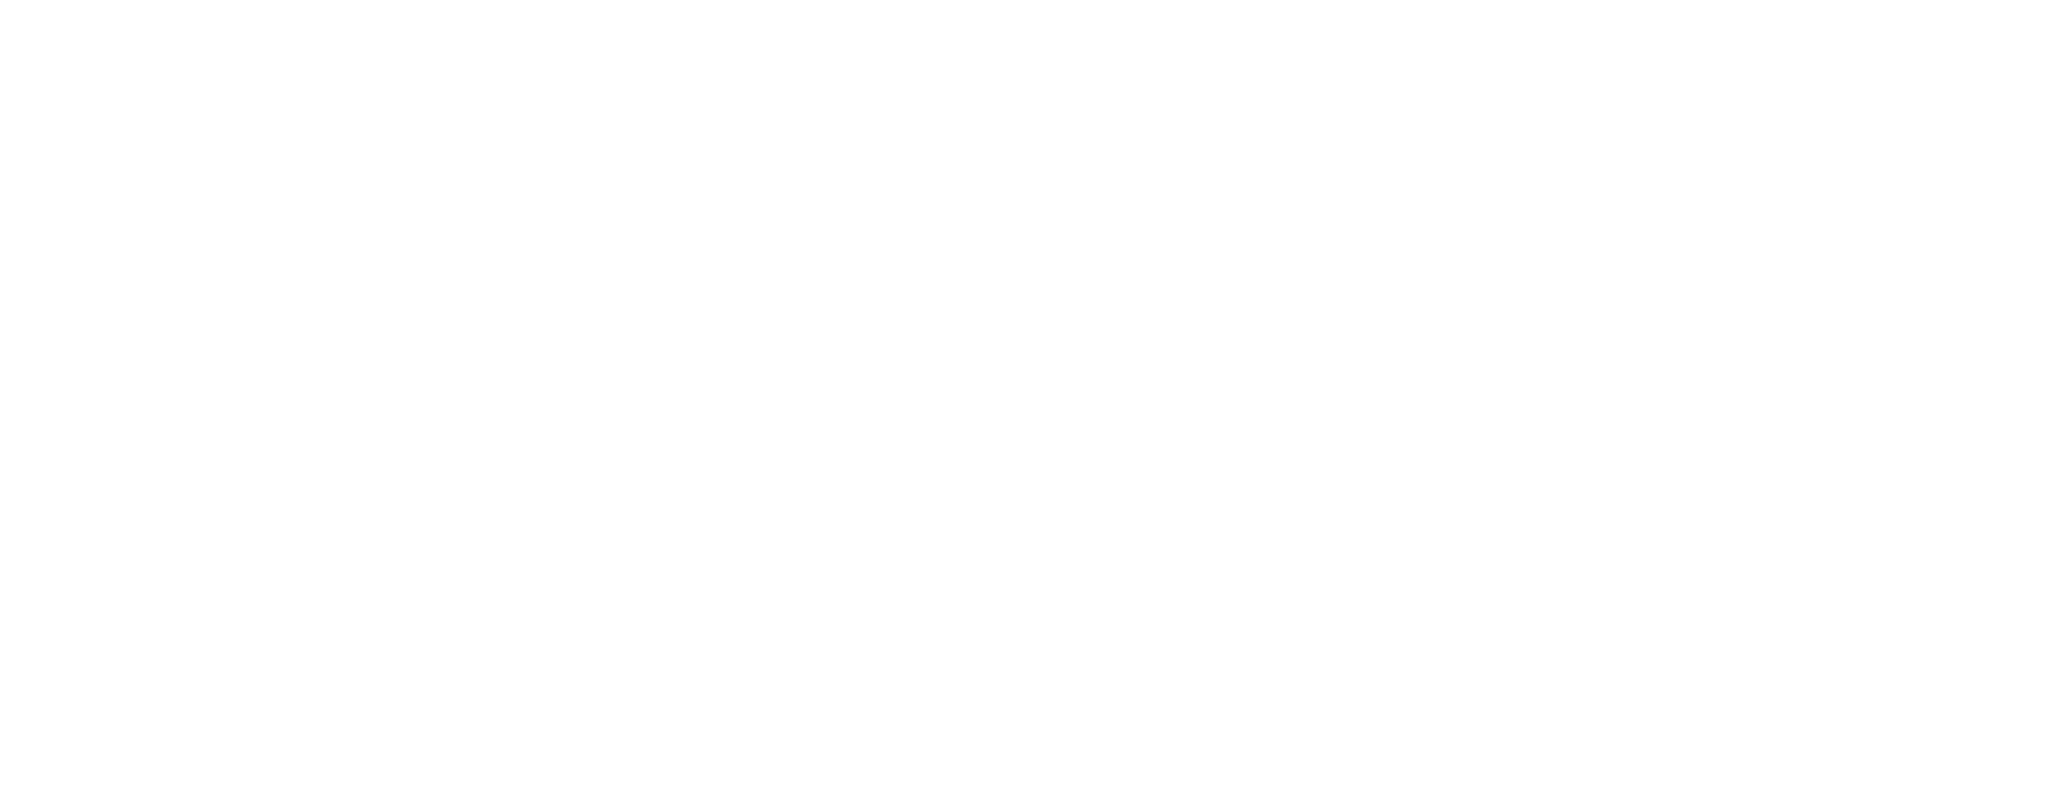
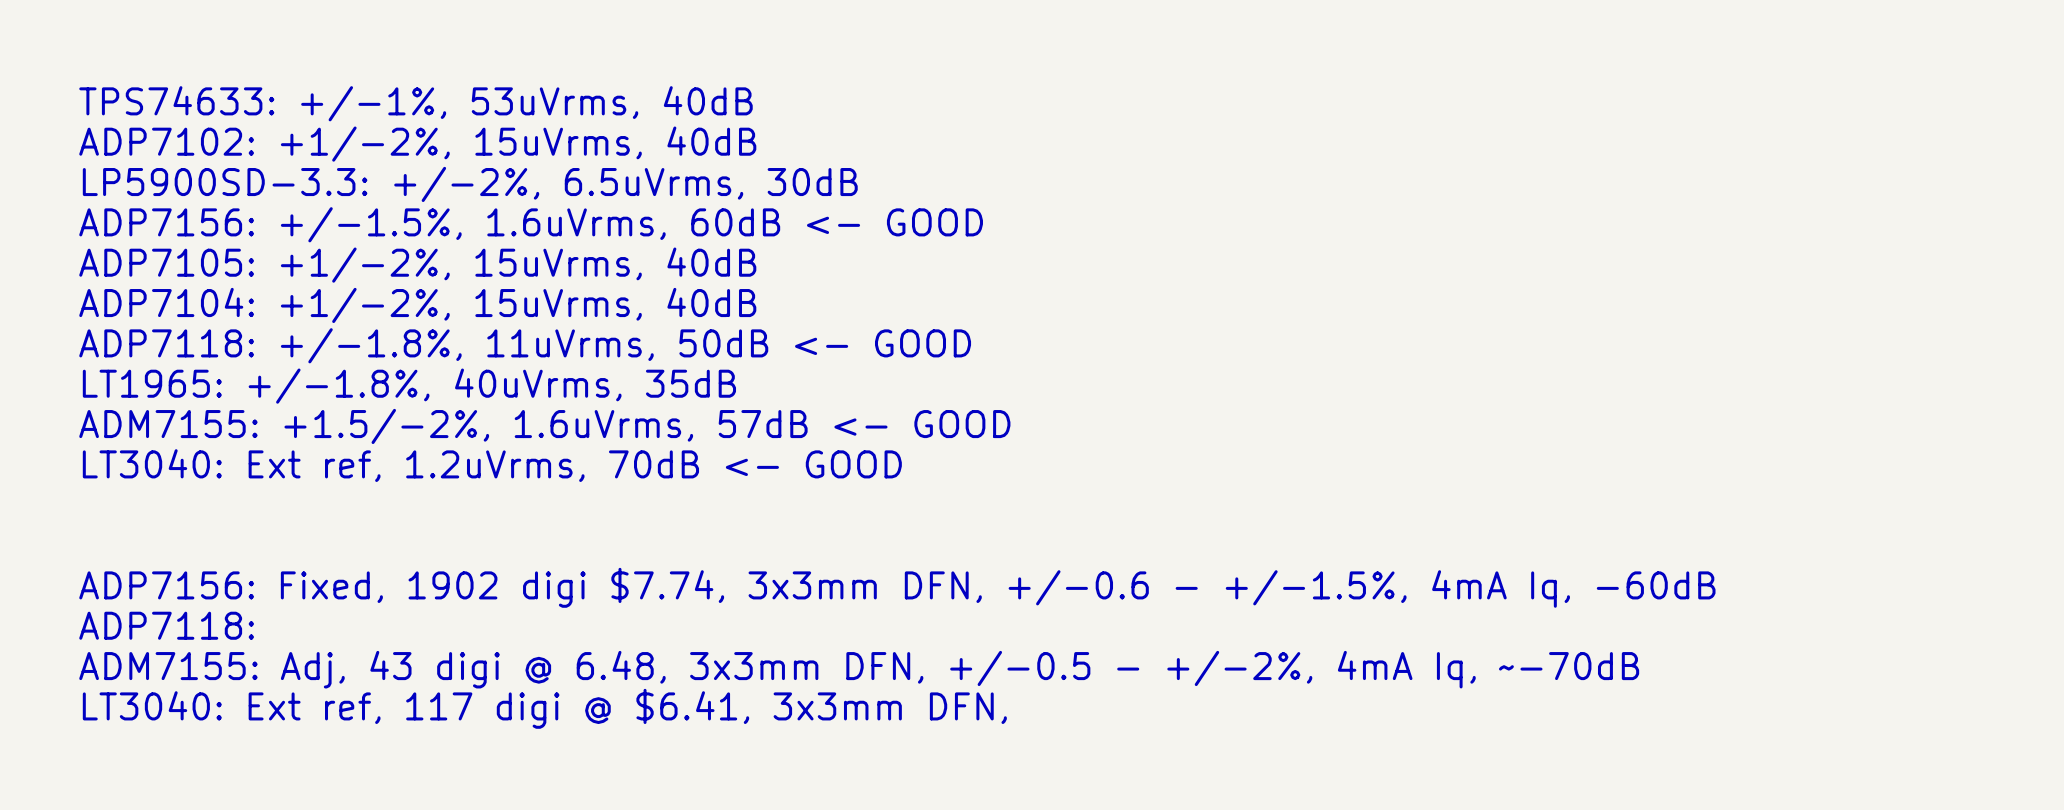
text: none -> TPS74633: +/-1%, 53uVrms, 40dB (415, 103)
text: none -> ADP7102: +1/-2%, 15uVrms, 40dB (417, 144)
text: none -> LP5900SD-3.3: +/-2%, 6.5uVrms, 30dB (470, 184)
text: none -> ADP7156: +/-1.5%, 1.6uVrms, 60dB <- GOOD (531, 224)
text: none -> ADP7105: +1/-2%, 15uVrms, 40dB (417, 265)
text: none -> ADP7104: +1/-2%, 15uVrms, 40dB (417, 305)
text: none -> ADP7118: +/-1.8%, 11uVrms, 50dB <- GOOD (525, 345)
text: none -> LT1965: +/-1.8%, 40uVrms, 35dB (409, 386)
text: none -> ADM7155: +1.5/-2%, 1.6uVrms, 57dB <- GOOD (544, 426)
text: none -> LT3040: Ext ref, 1.2uVrms, 70dB <- GOOD (492, 465)
text: none -> ADP7156: Fixed, 1902 digi $7.74, 3x3mm DFN, +/-0.6 - +/-1.5%, 4mA Iq, -60dB (897, 587)
text: none -> ADP7118: (166, 625)
text: none -> ADM7155: Adj, 43 digi @ 6.48, 3x3mm DFN, +/-0.5 - +/-2%, 4mA Iq, ~-70dB (859, 669)
text: none -> LT3040: Ext ref, 117 digi @ $6.41, 3x3mm DFN, (544, 708)

